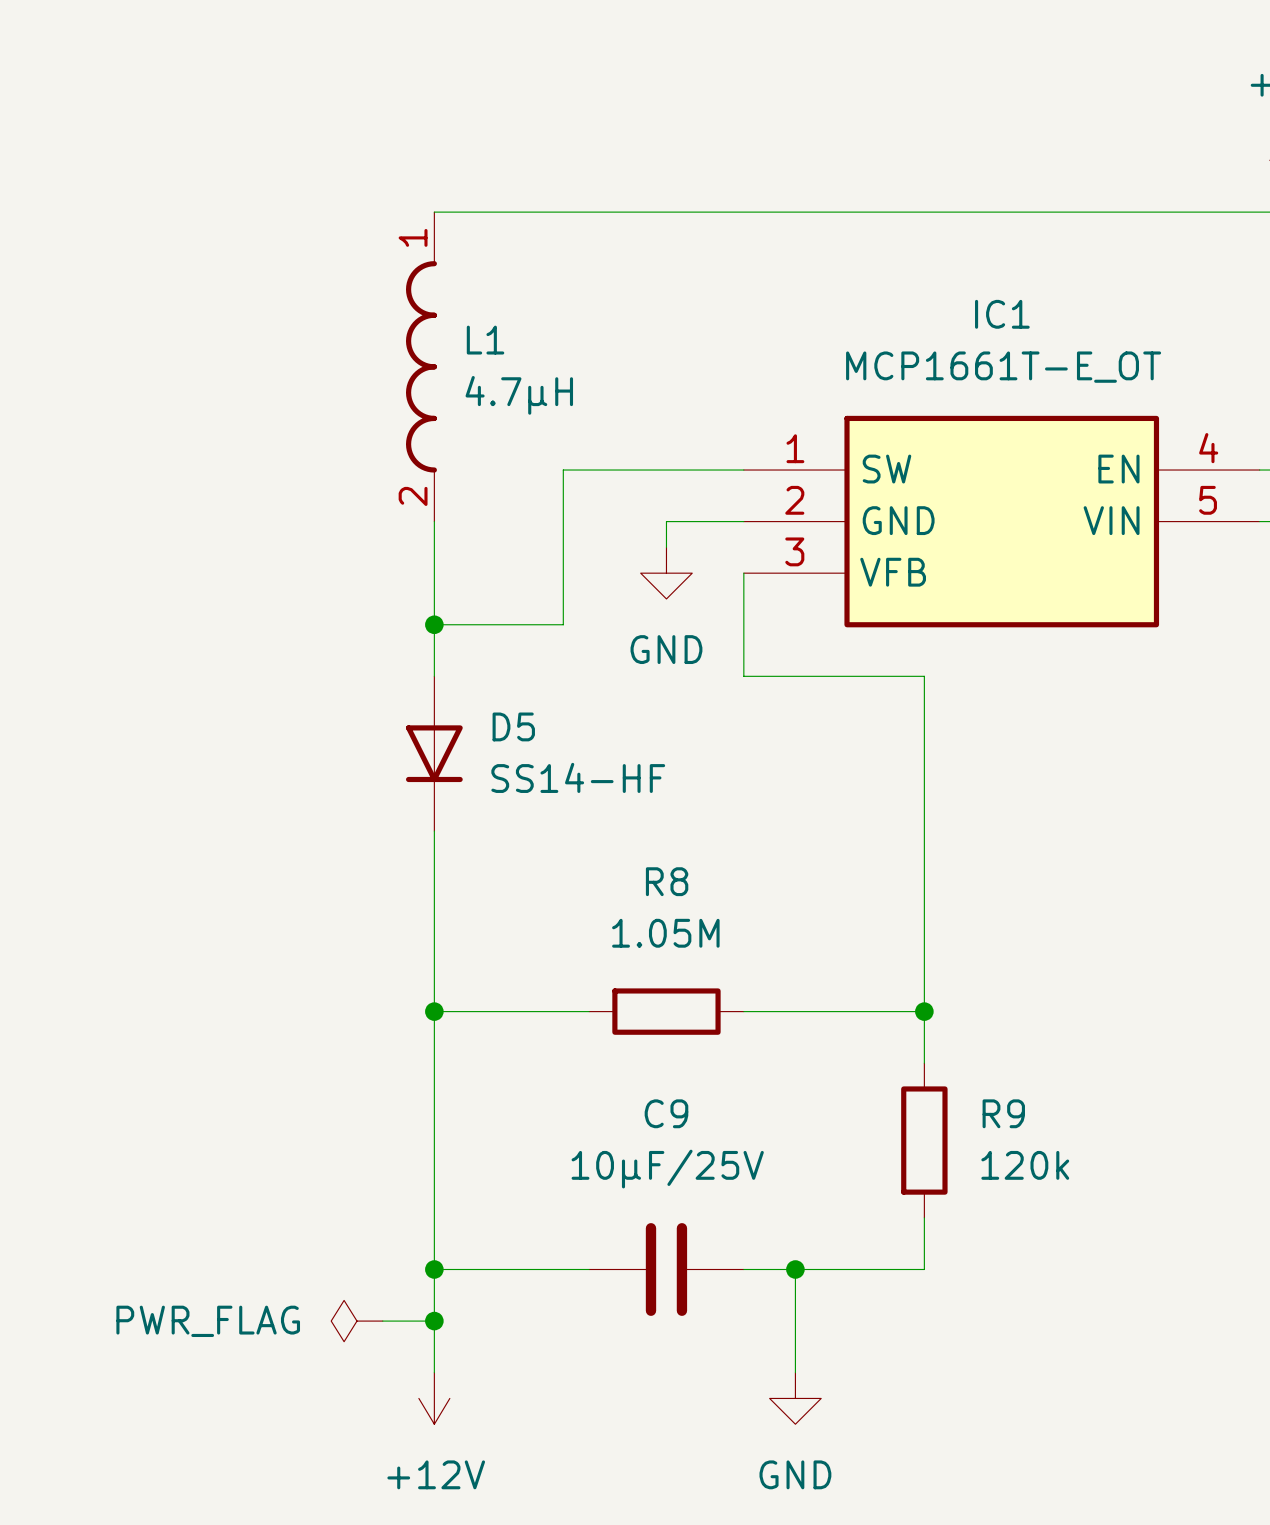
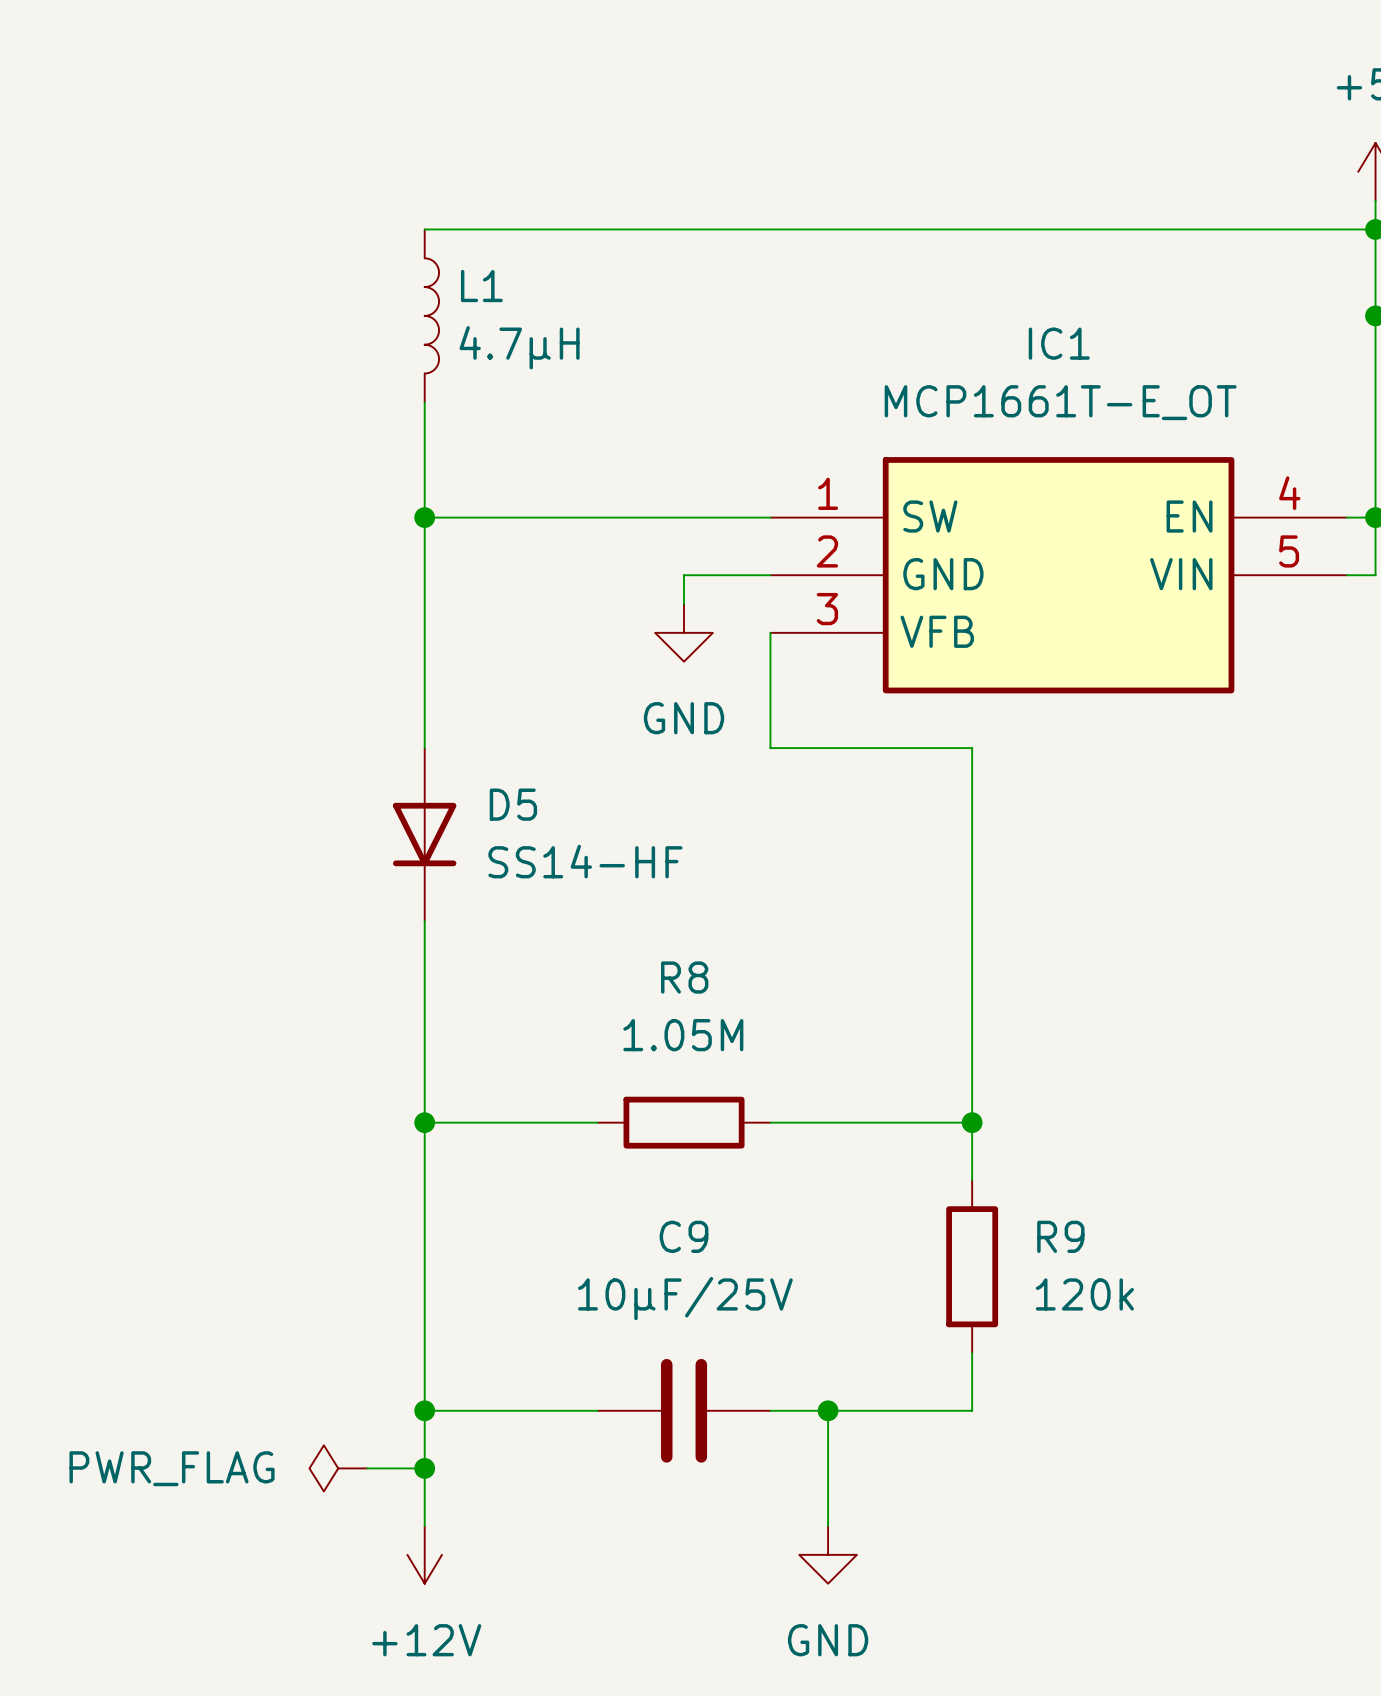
L1 symbol: [405, 212, 437, 522] -> [424, 229, 440, 403]
wire: none -> (424, 402) (424, 575)
junction: none -> (424, 517)
wire: (563, 470) (563, 624) (434, 624) -> (568, 517) (424, 517)
junction: (434, 624) -> none

